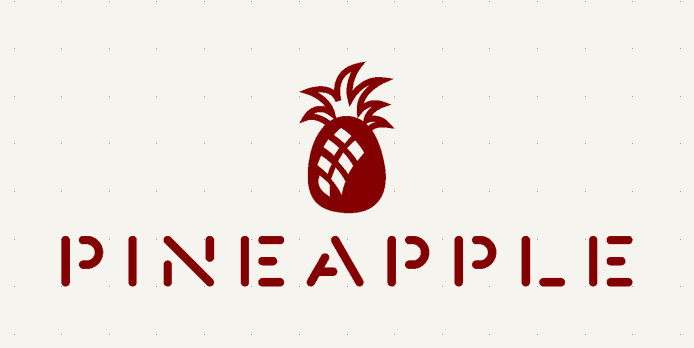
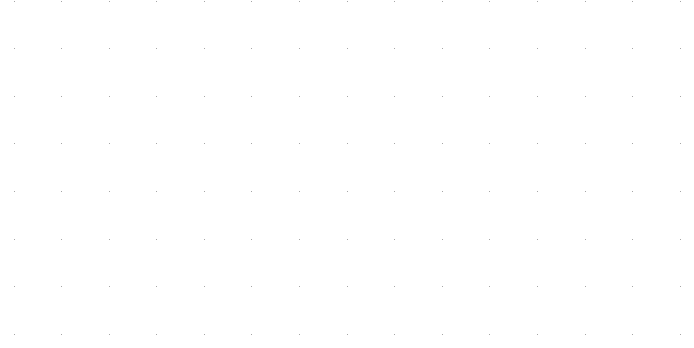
part: (346, 173) -> none

